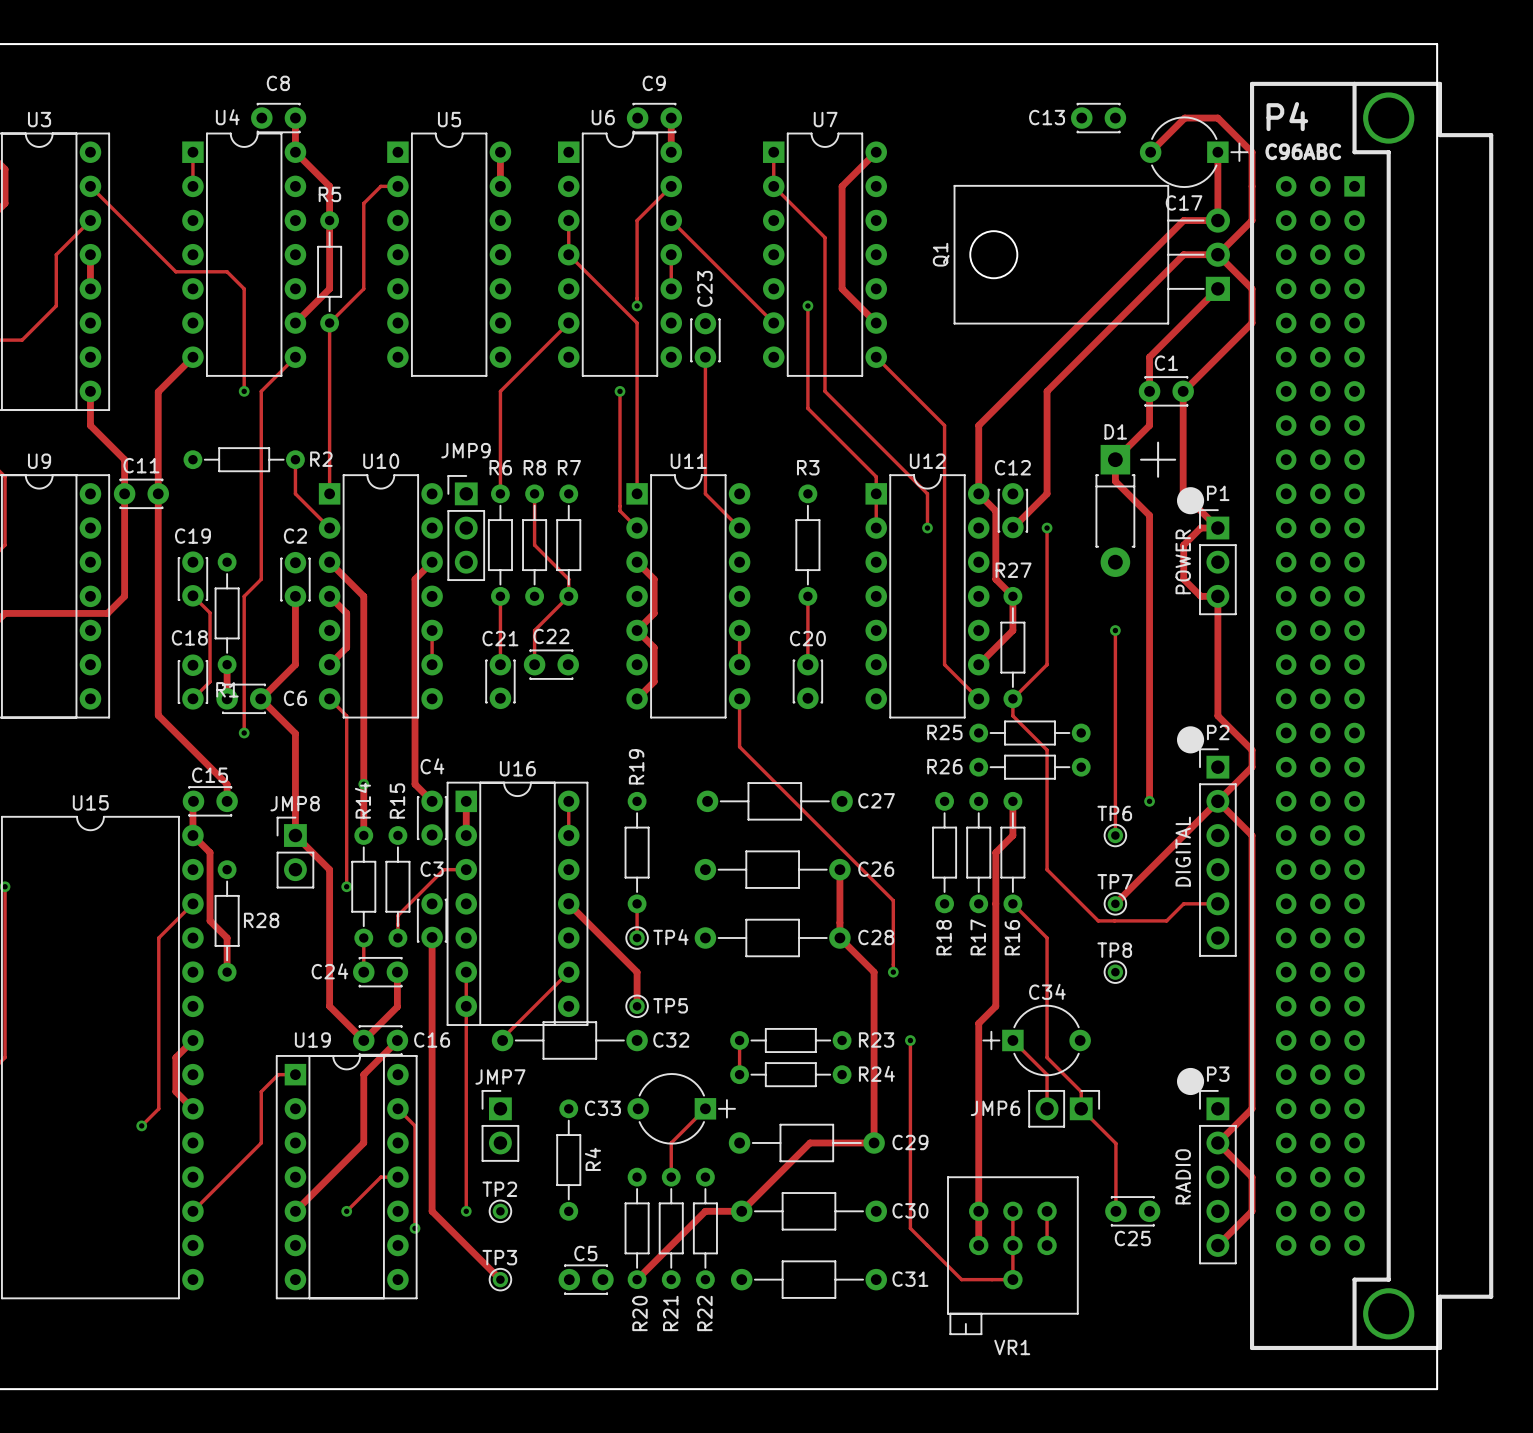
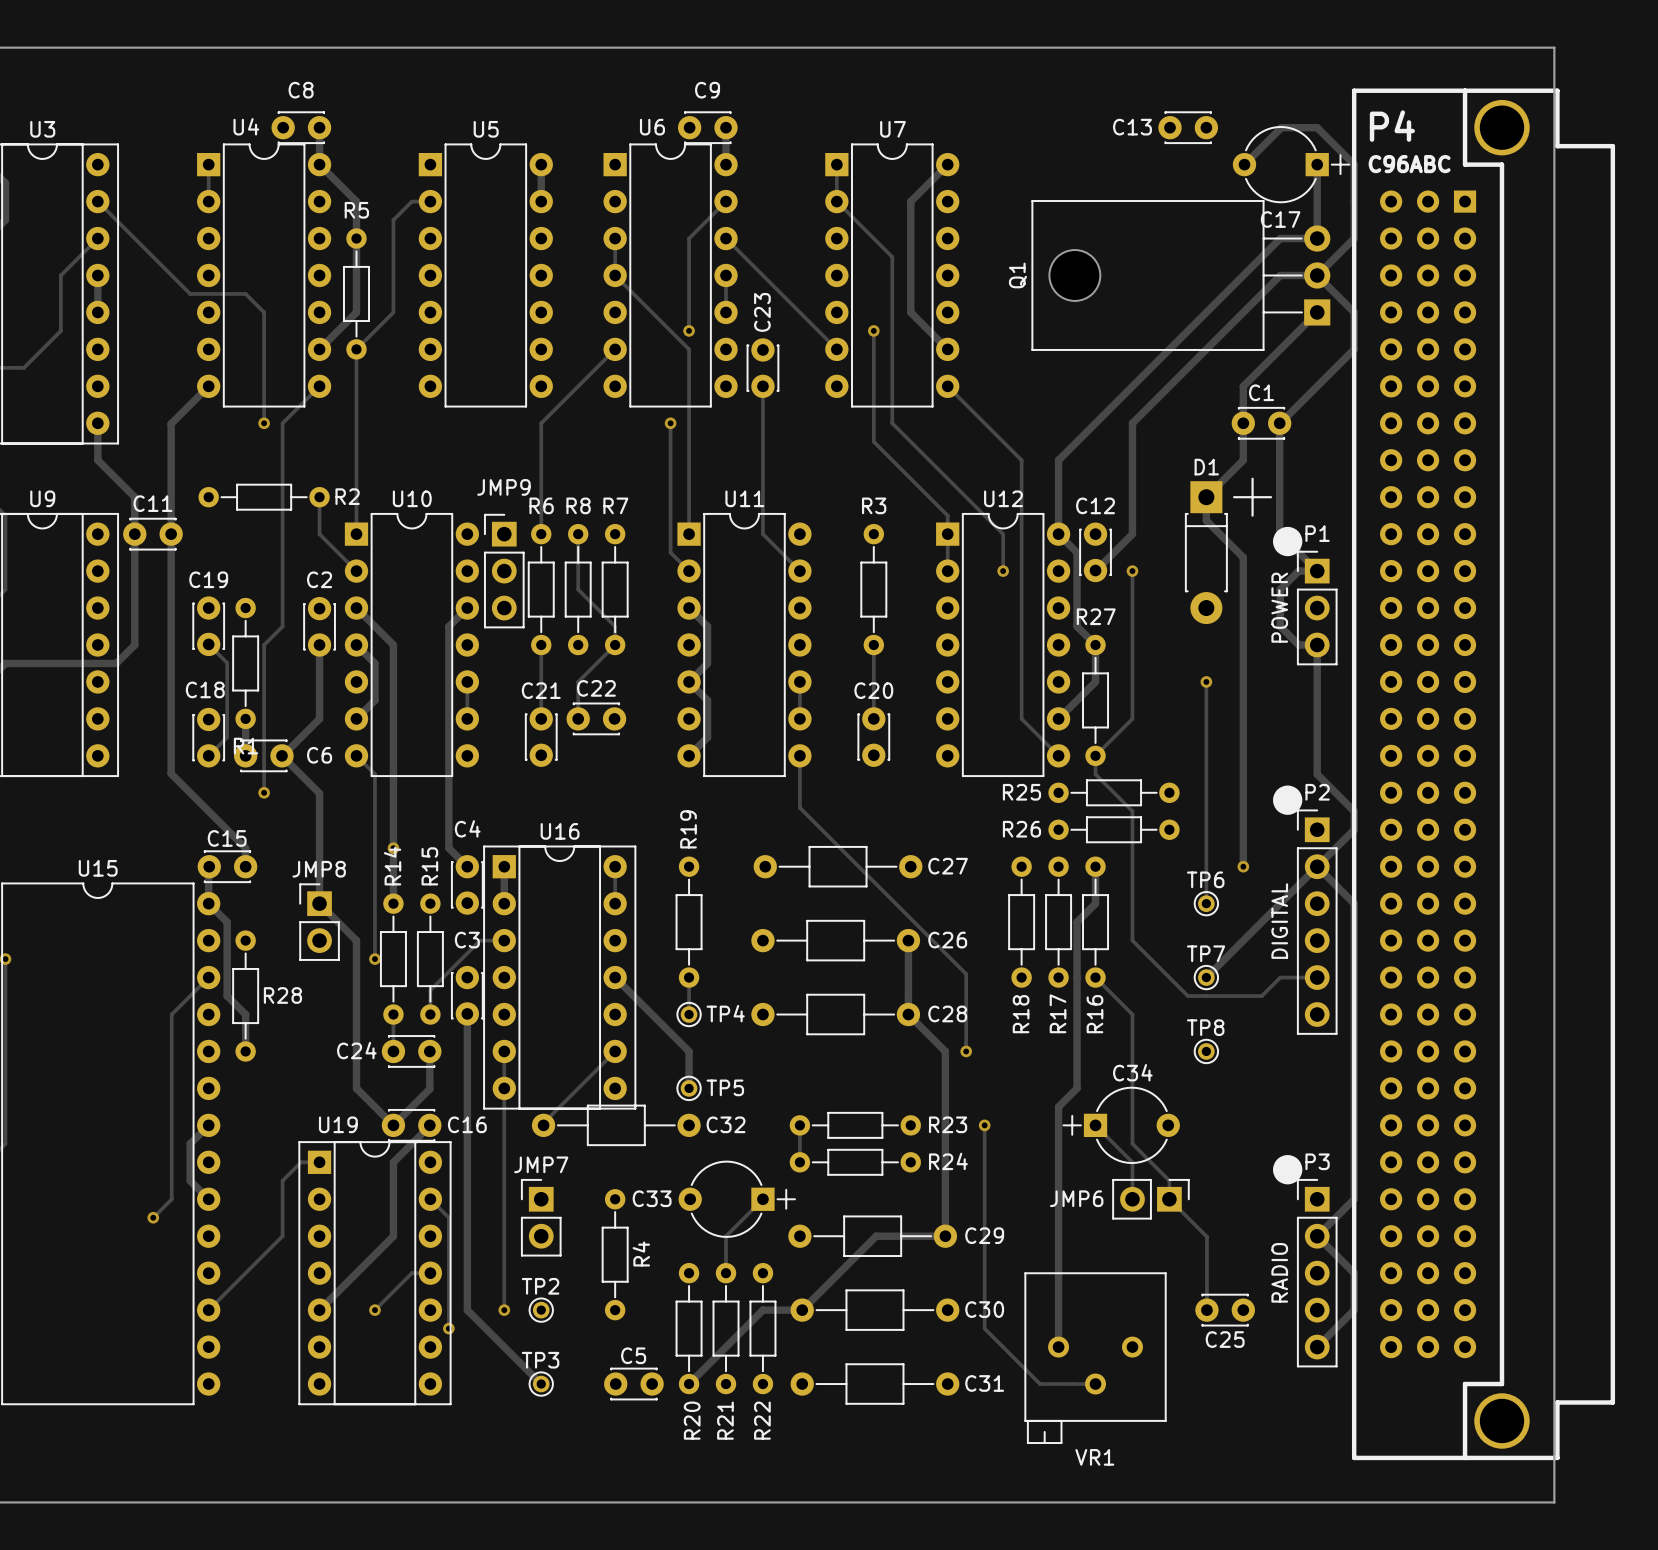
VR1 footprint: [947, 1176, 1079, 1335] -> [1024, 1272, 1167, 1444]
track: (1012, 1211) (1012, 1279) -> none
track: (1047, 1211) (1047, 1245) -> none

